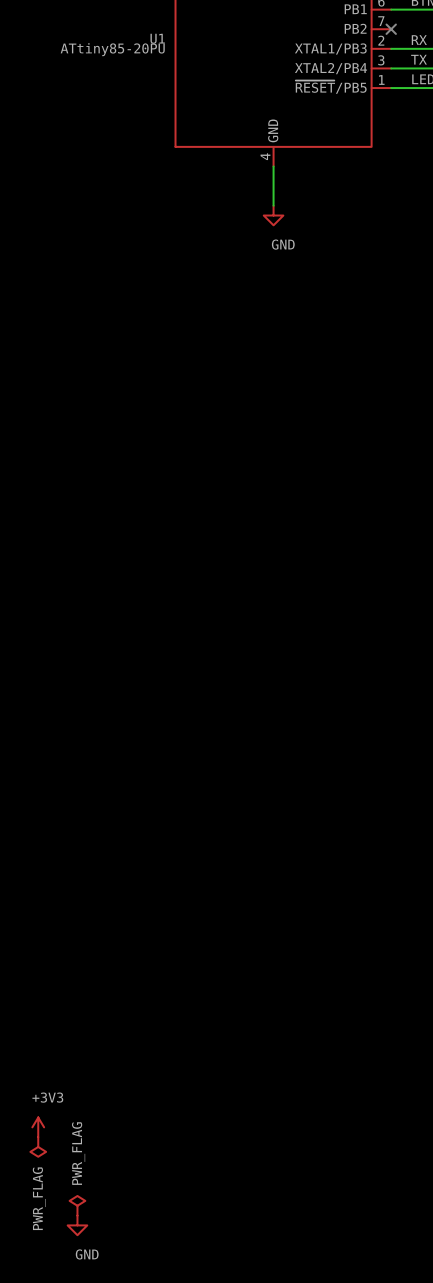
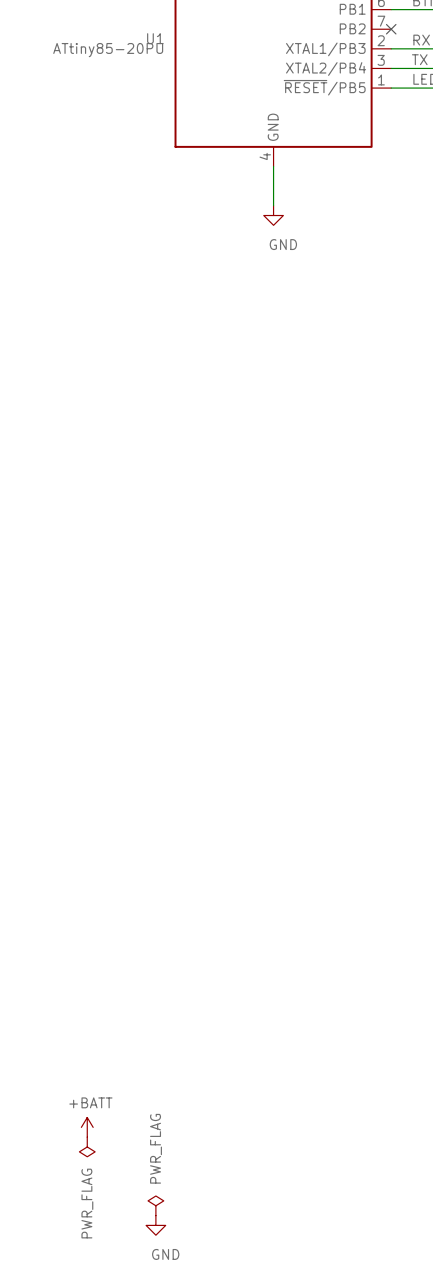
power symbol: +3V3 (38, 1127) -> none
power symbol: none -> +BATT (87, 1127)
power symbol: PWR_FLAG (38, 1146) -> none
power symbol: none -> PWR_FLAG (87, 1146)
power symbol: PWR_FLAG (77, 1205) -> none
power symbol: none -> PWR_FLAG (155, 1205)
power symbol position: GND (77, 1225) -> GND (155, 1225)

